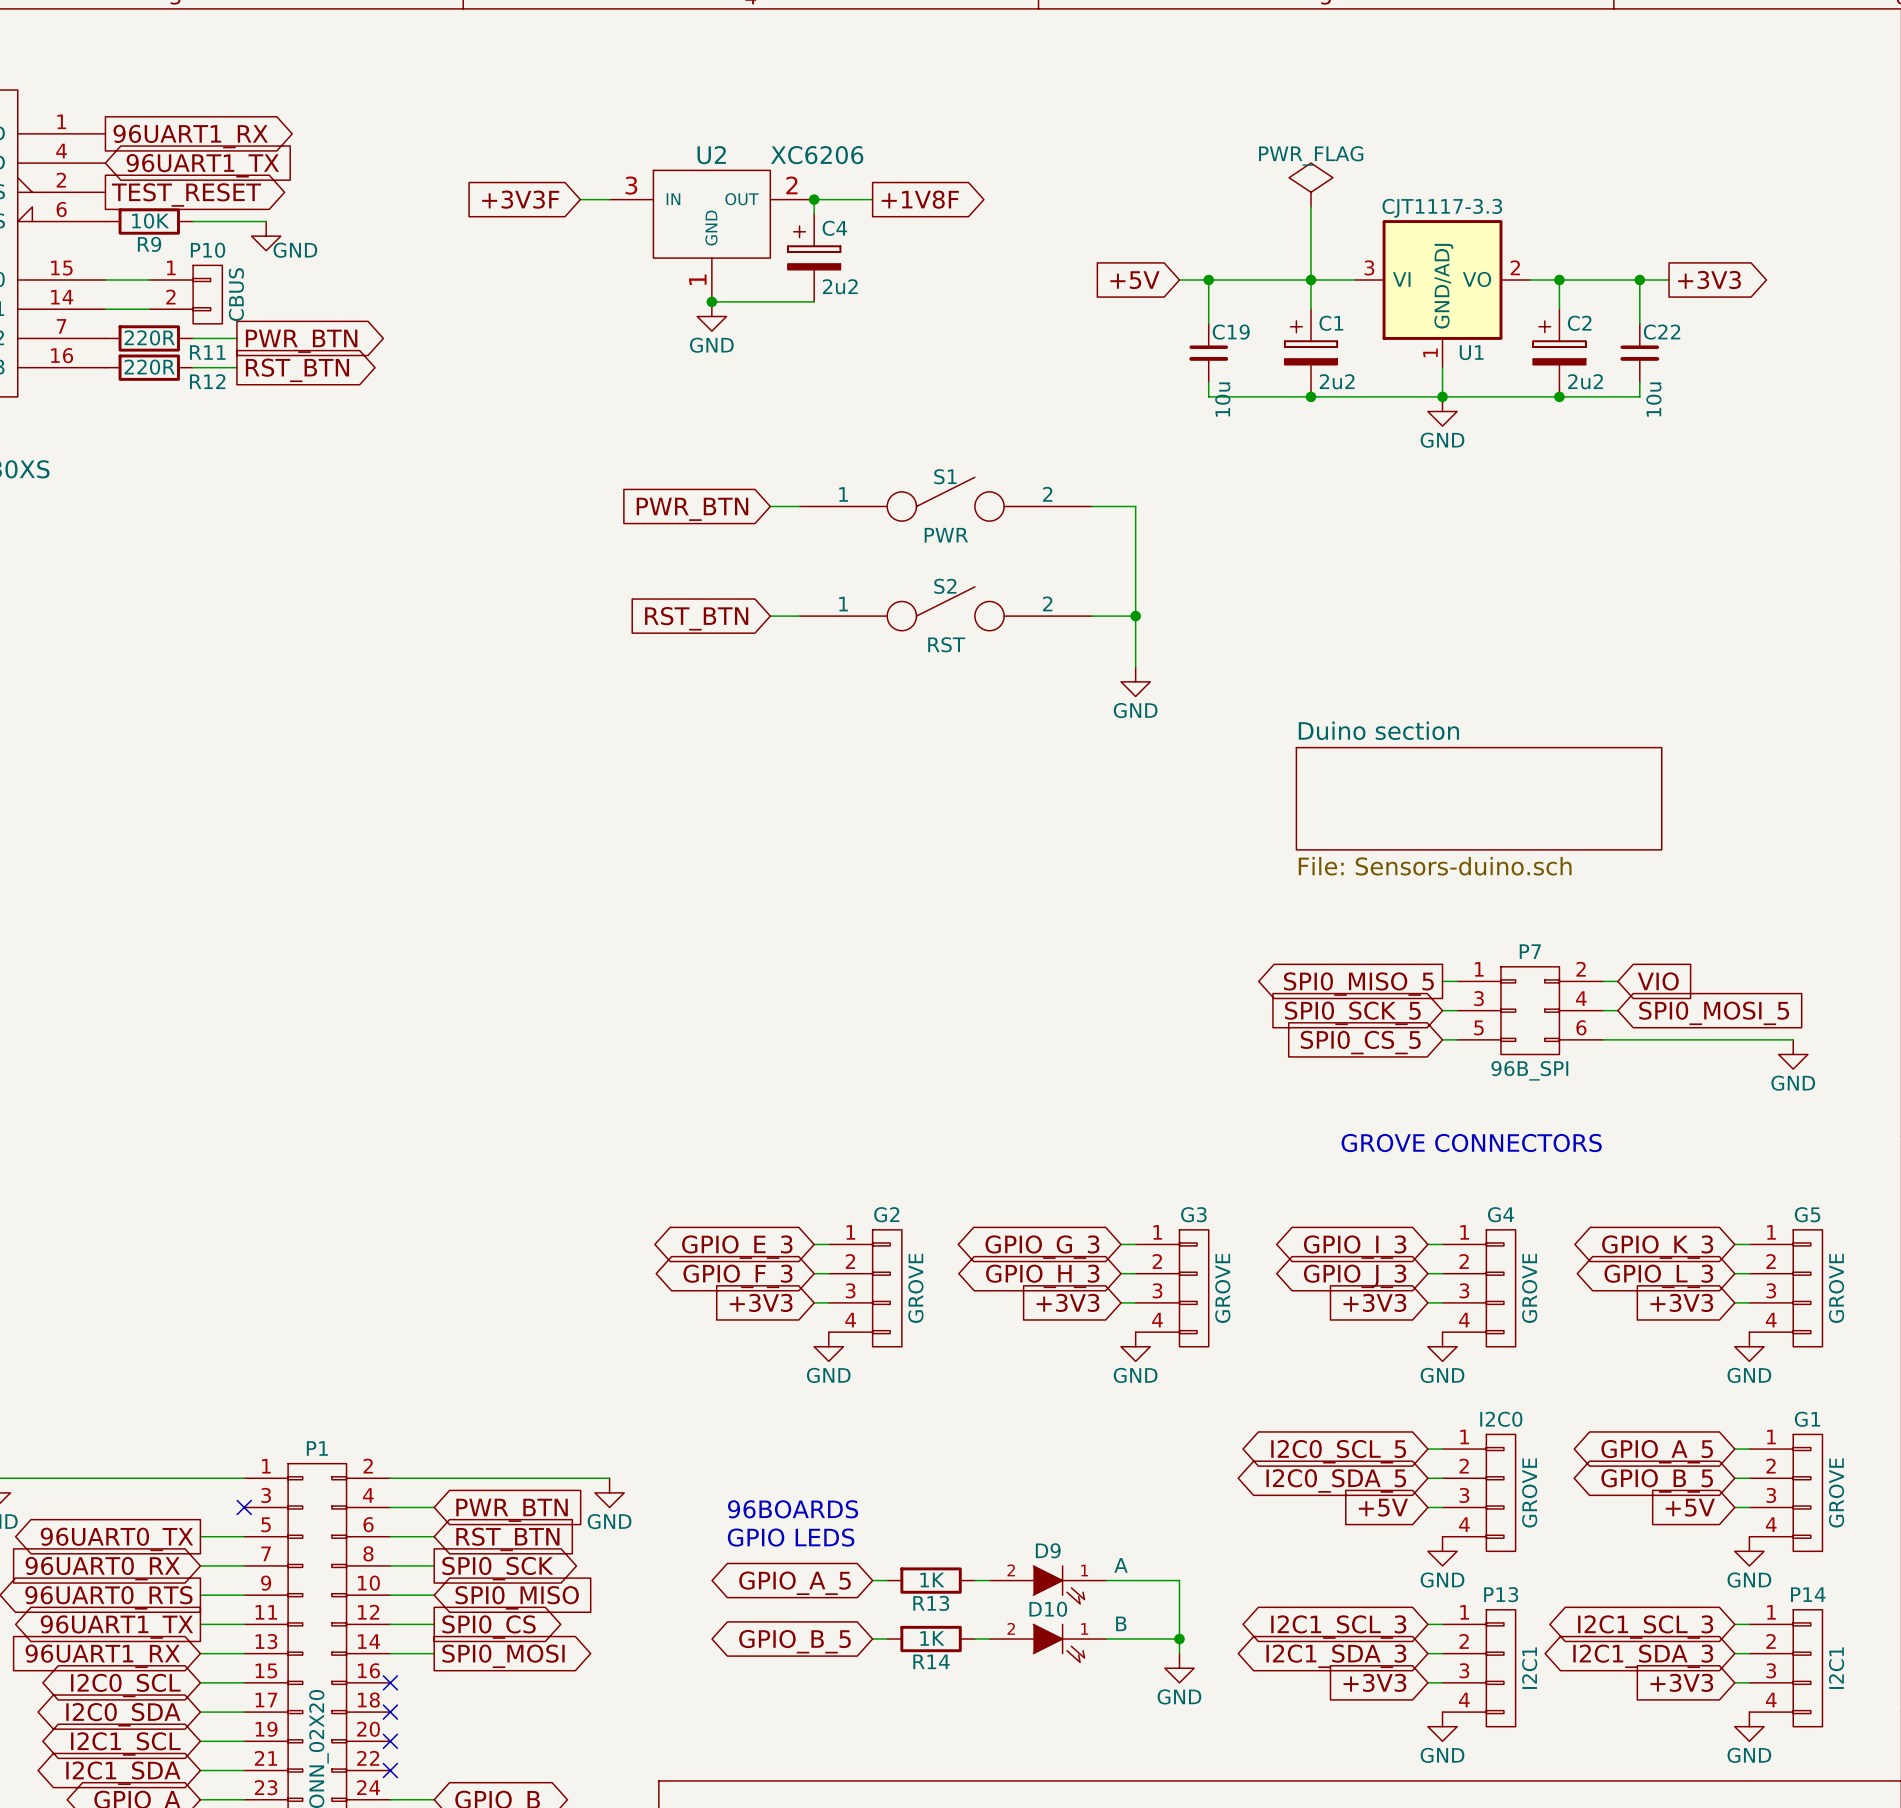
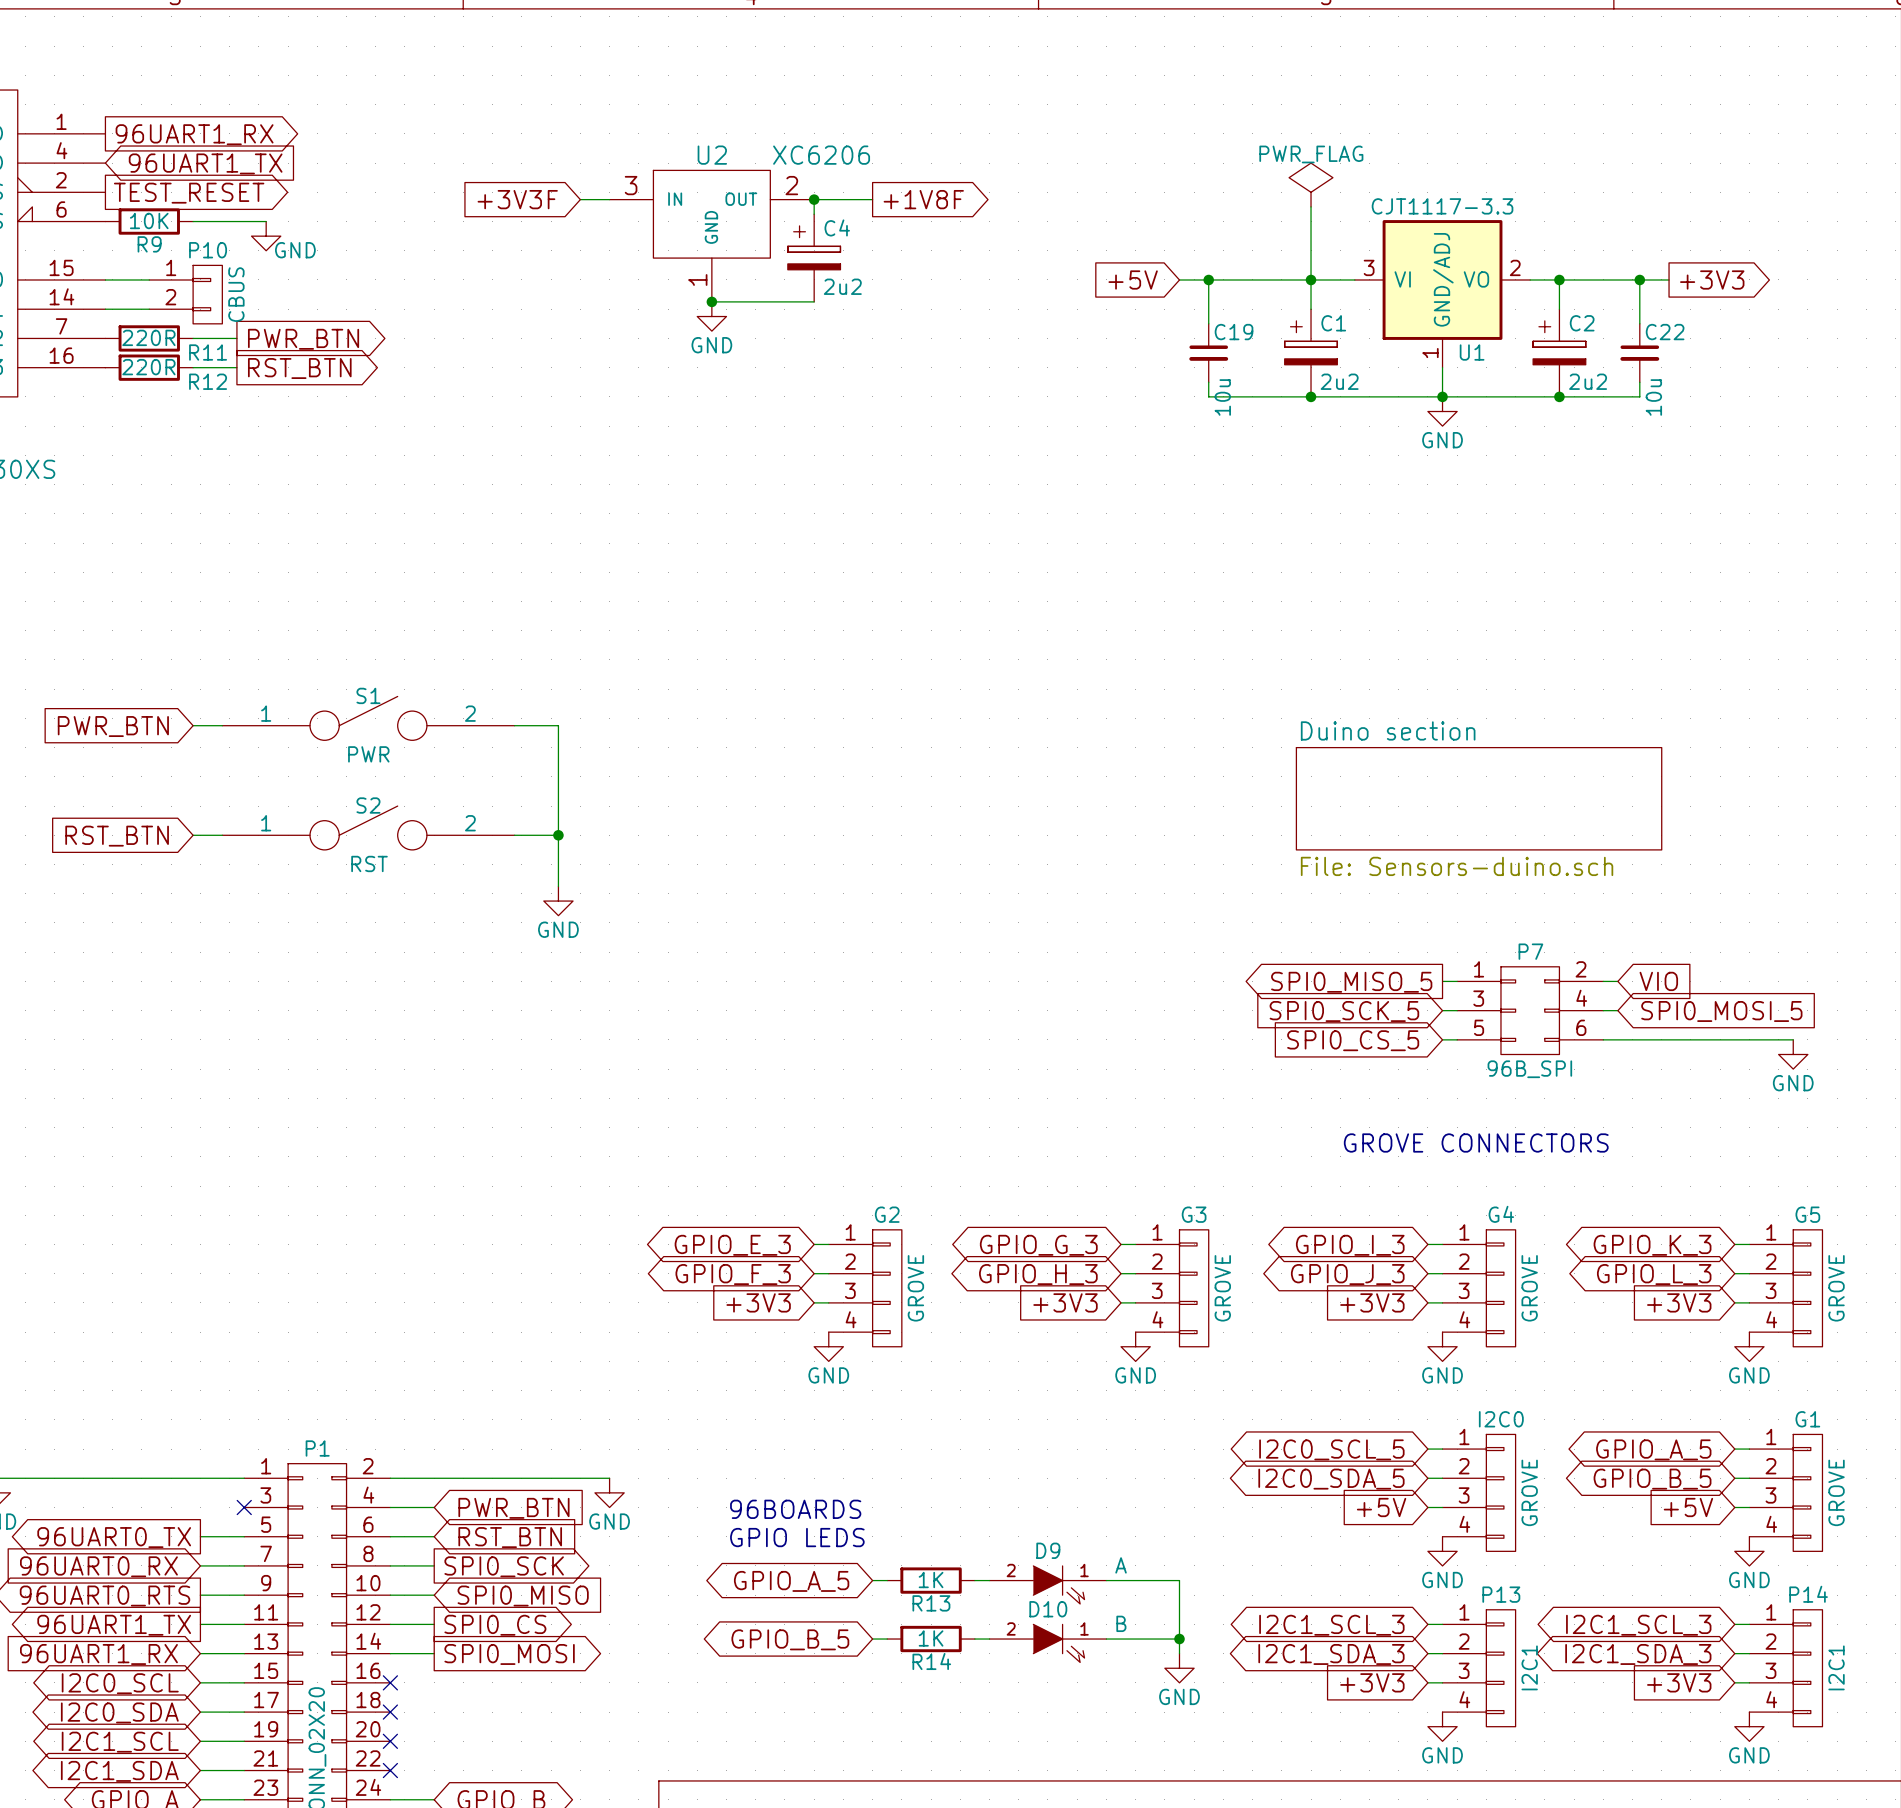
S1 position: (945, 499) -> (368, 718)
wire: (770, 506) (799, 506) -> none
wire: (1091, 506) (1135, 506) (1135, 667) -> none
global label: PWR_BTN (692, 509) -> none
S2 position: (945, 608) -> (368, 827)
wire: (770, 616) (799, 616) -> none
wire: (1091, 616) (1135, 616) -> none
junction: (1135, 616) -> none
global label: RST_BTN (696, 618) -> none
power symbol: GND (1135, 681) -> none
wire: none -> (193, 725) (222, 725)
wire: none -> (514, 725) (558, 725) (558, 886)
global label: none -> PWR_BTN (113, 726)
wire: none -> (193, 835) (222, 835)
wire: none -> (514, 835) (558, 835)
junction: none -> (558, 835)
global label: none -> RST_BTN (117, 836)
power symbol: none -> GND (558, 901)

